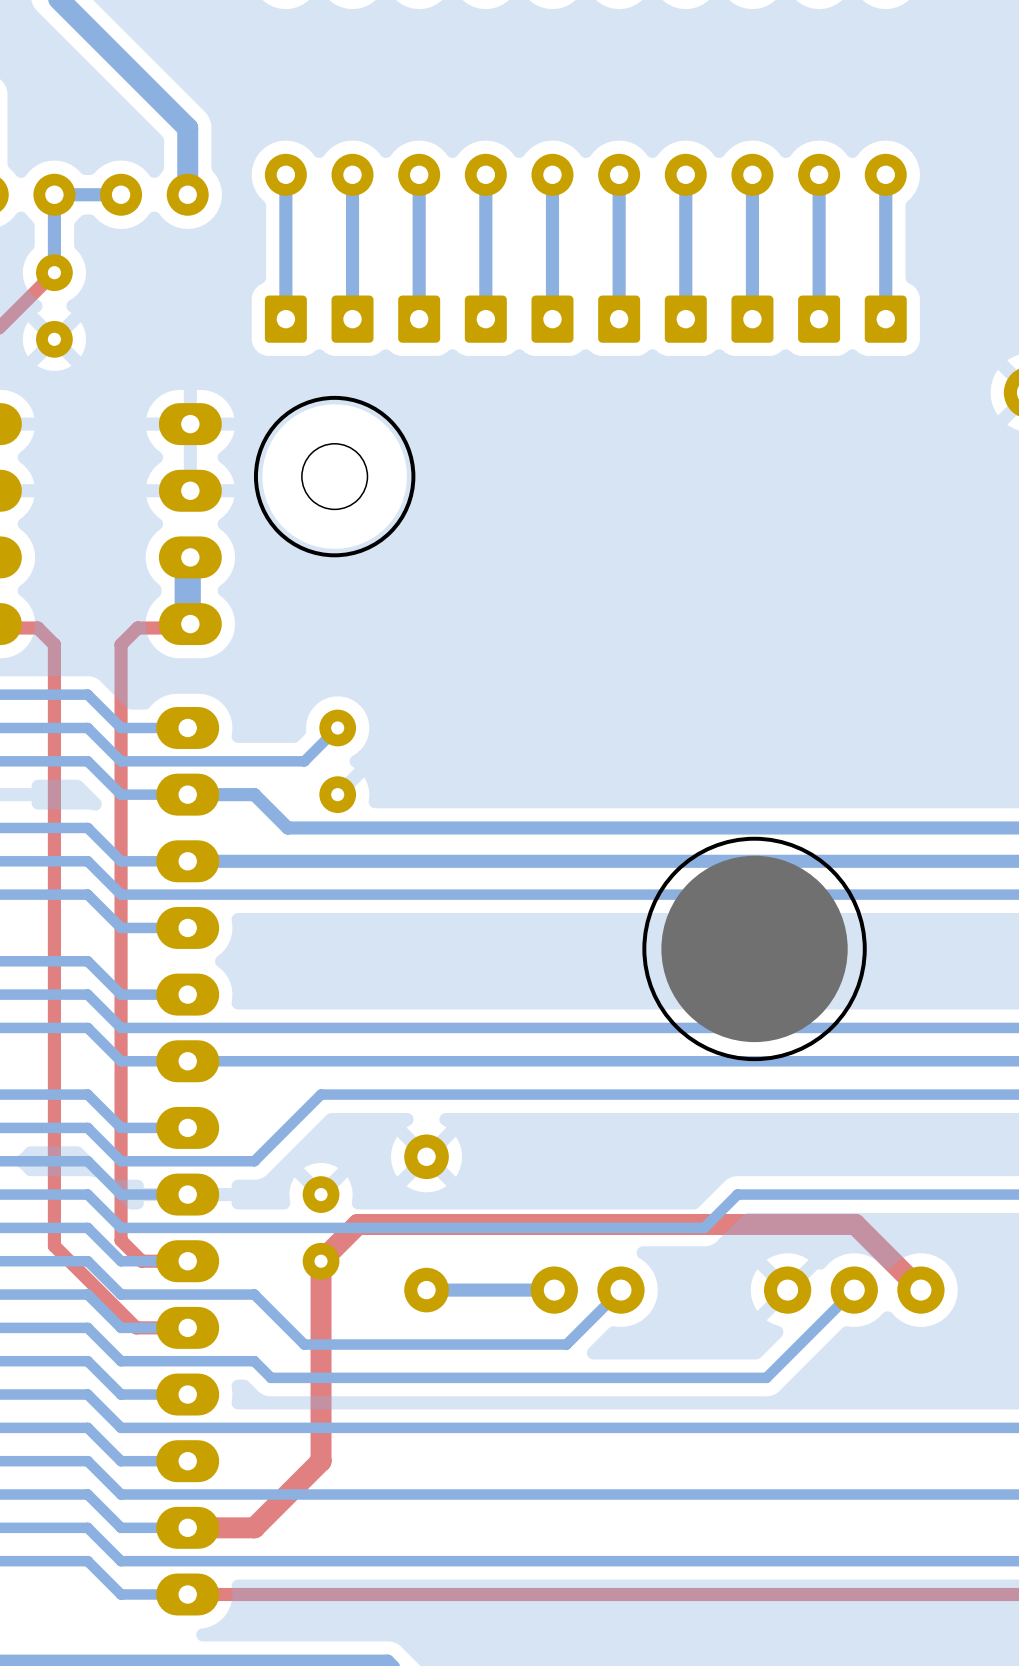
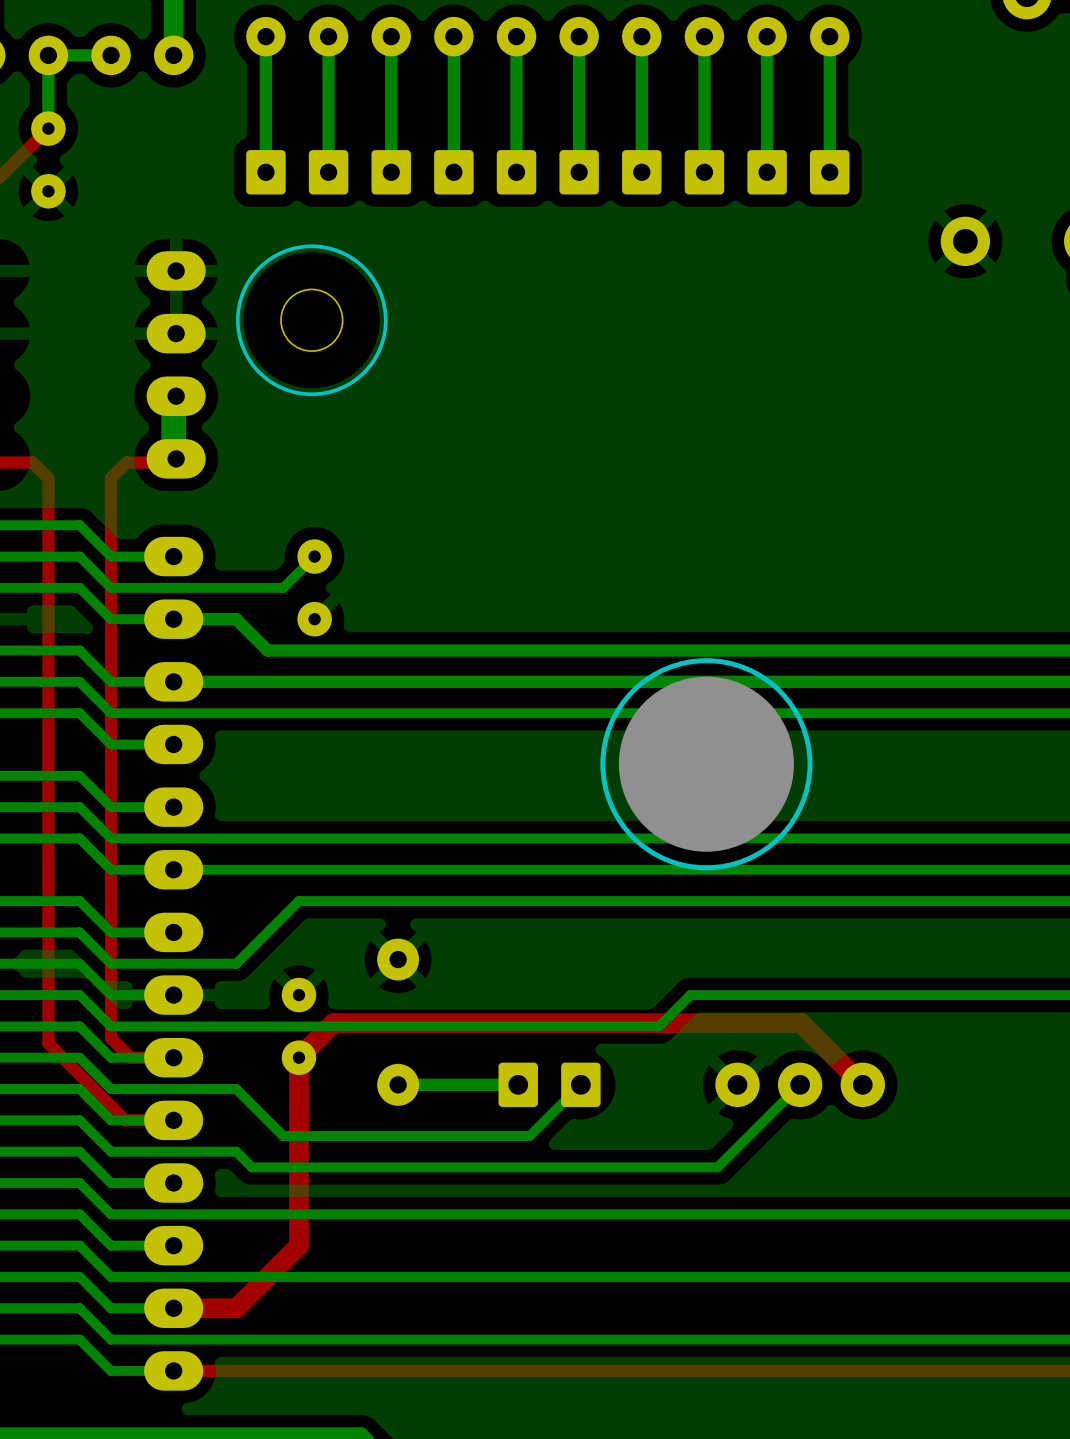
drawing shape: [642, 836, 867, 1062] -> [600, 658, 813, 871]
part footprint: [530, 1266, 645, 1314] -> [498, 1062, 601, 1108]

